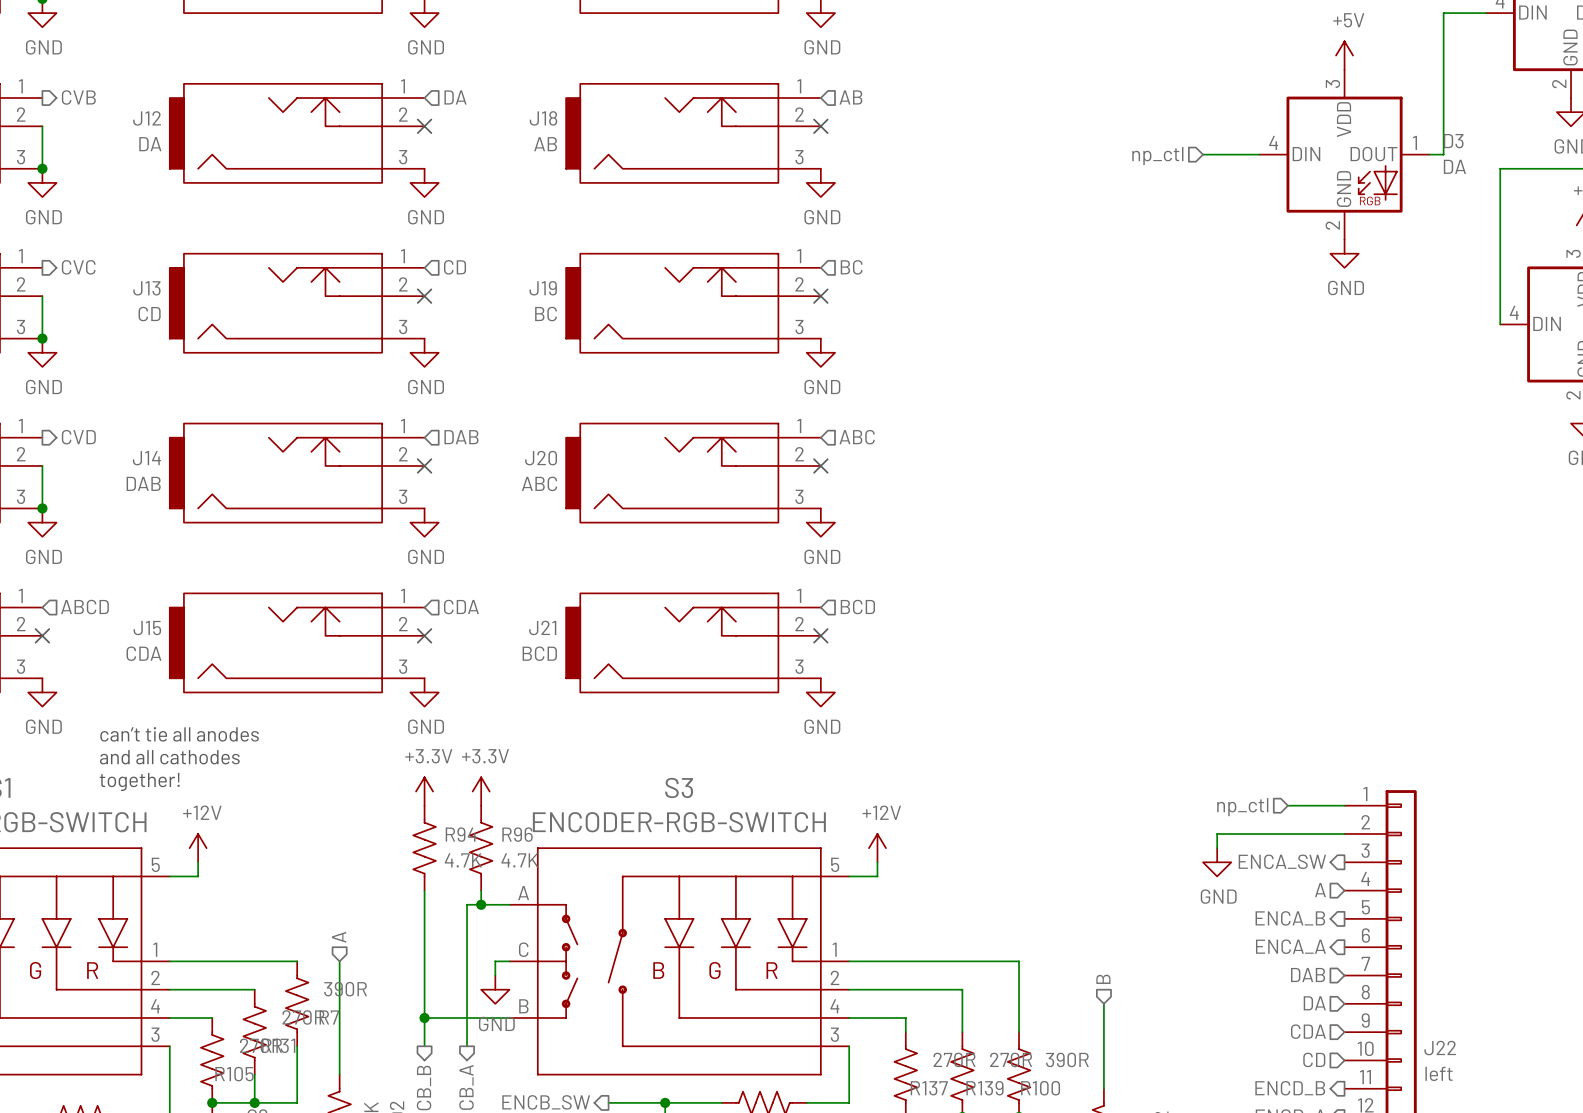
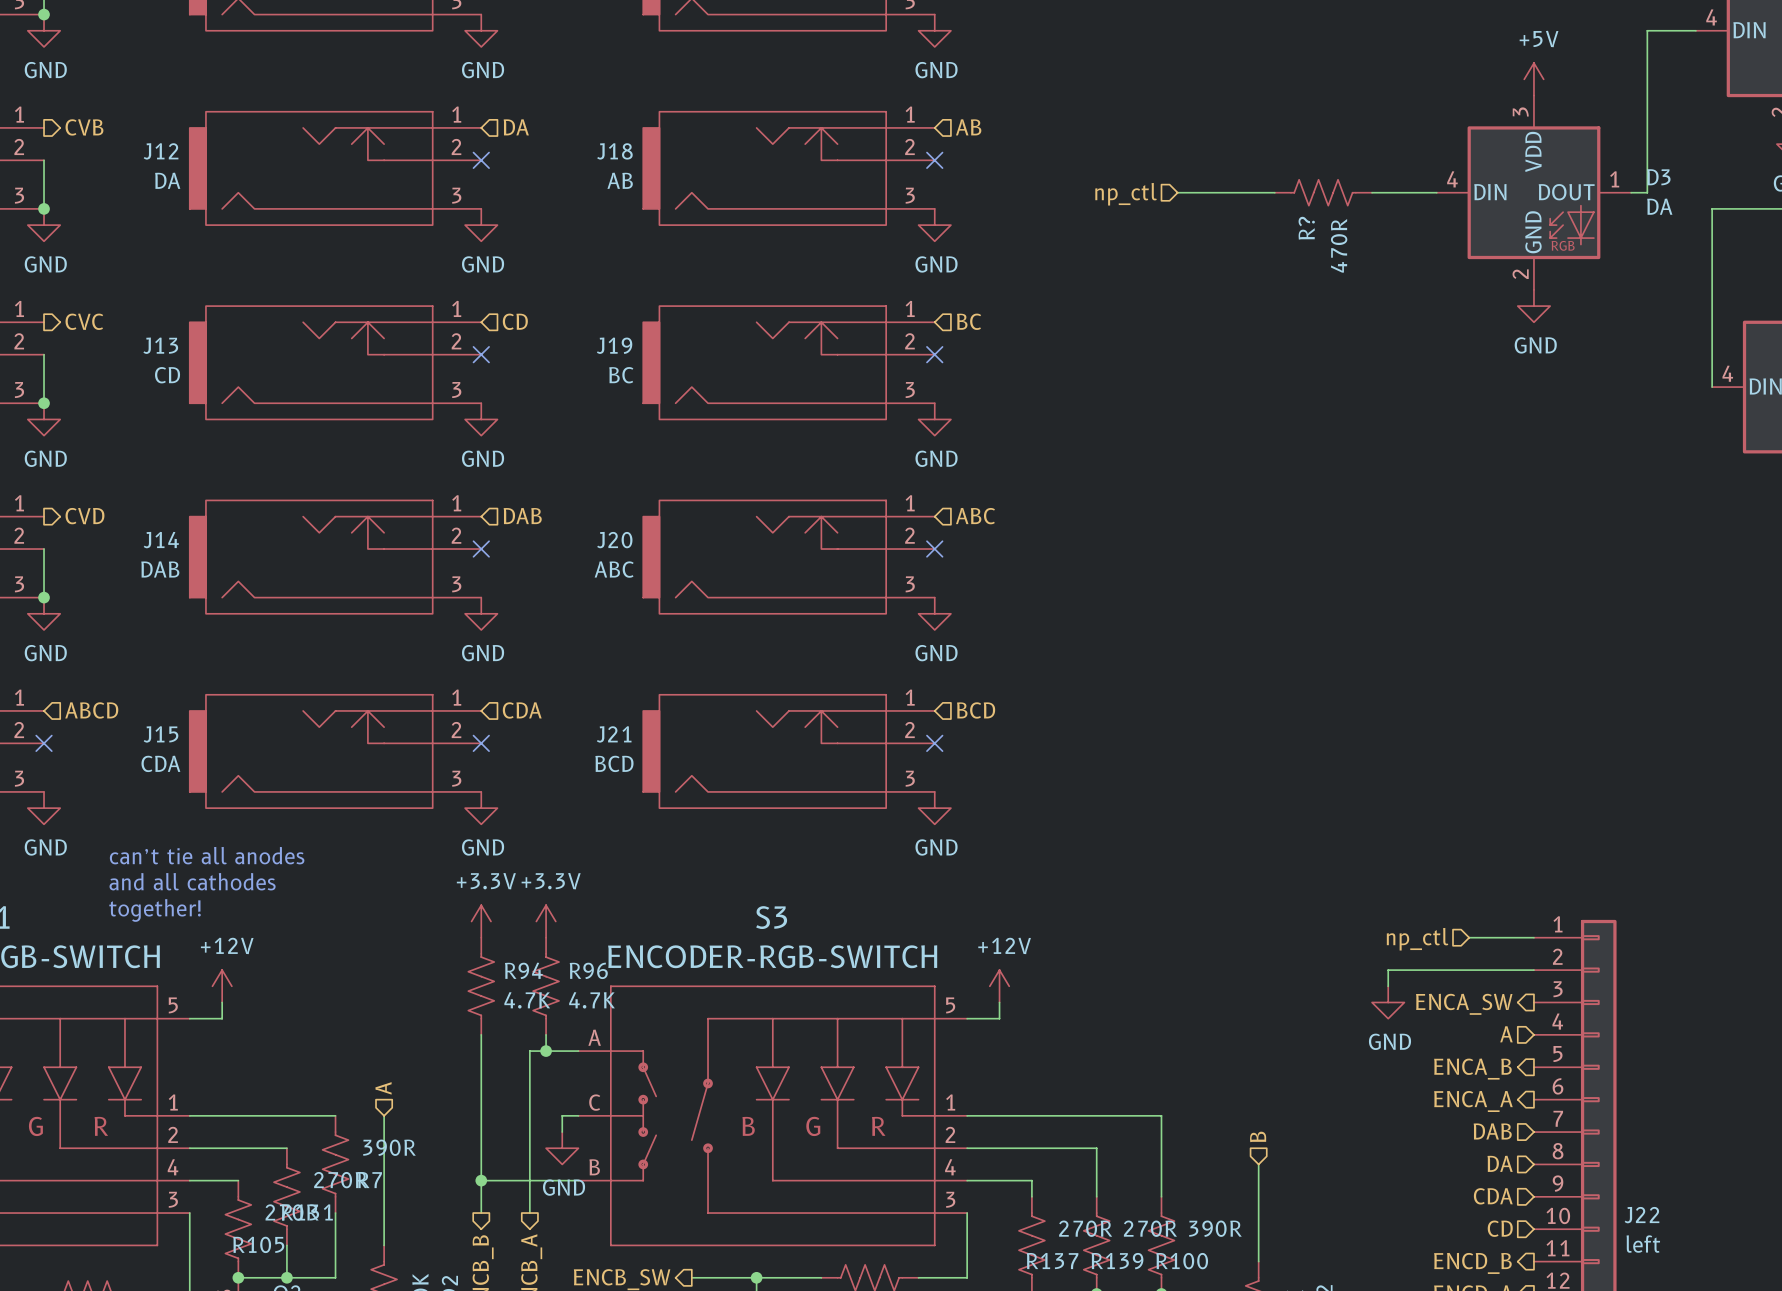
wire: none -> (1177, 192) (1274, 192)
R?: none -> 470R (1323, 192)
hierarchical label position: np_ctl (1157, 156) -> np_ctl (1126, 194)

